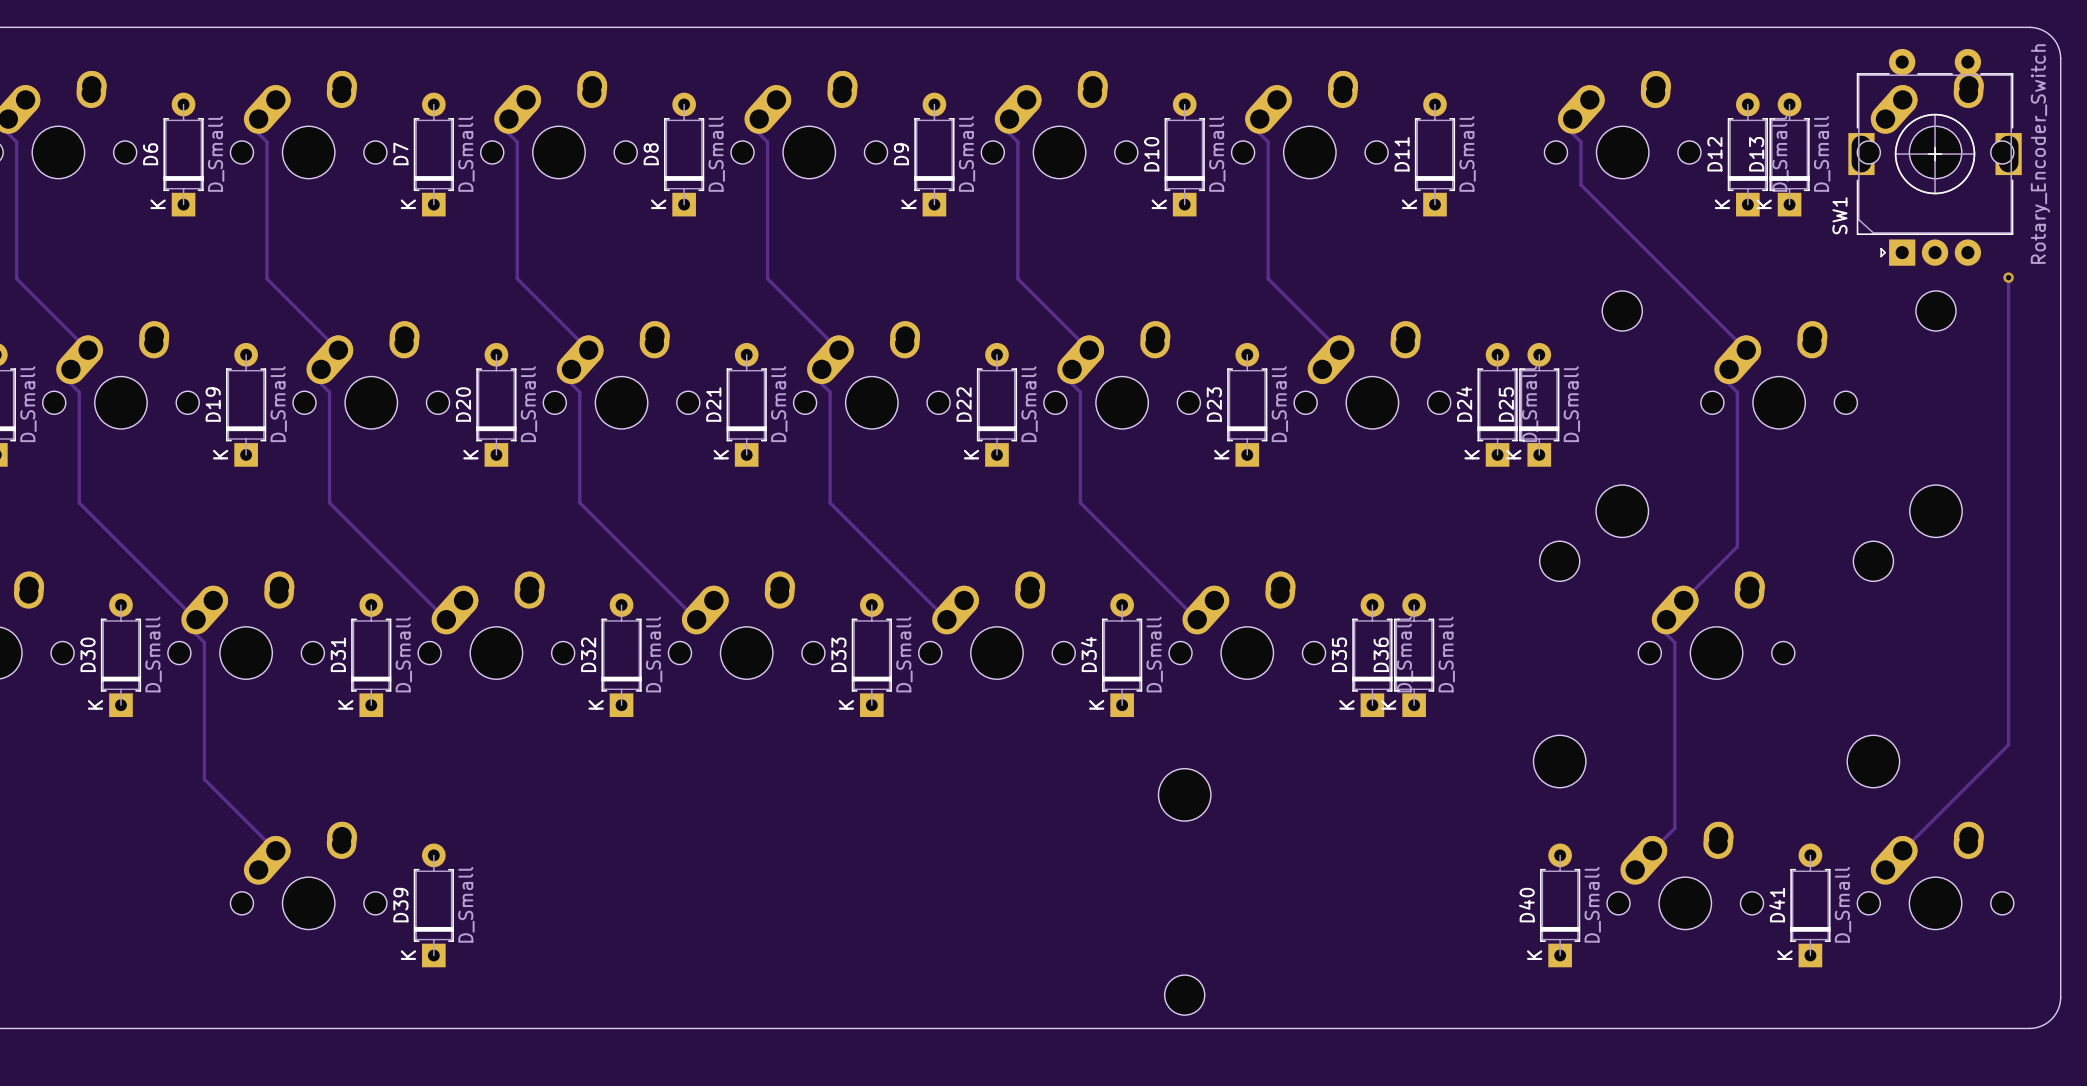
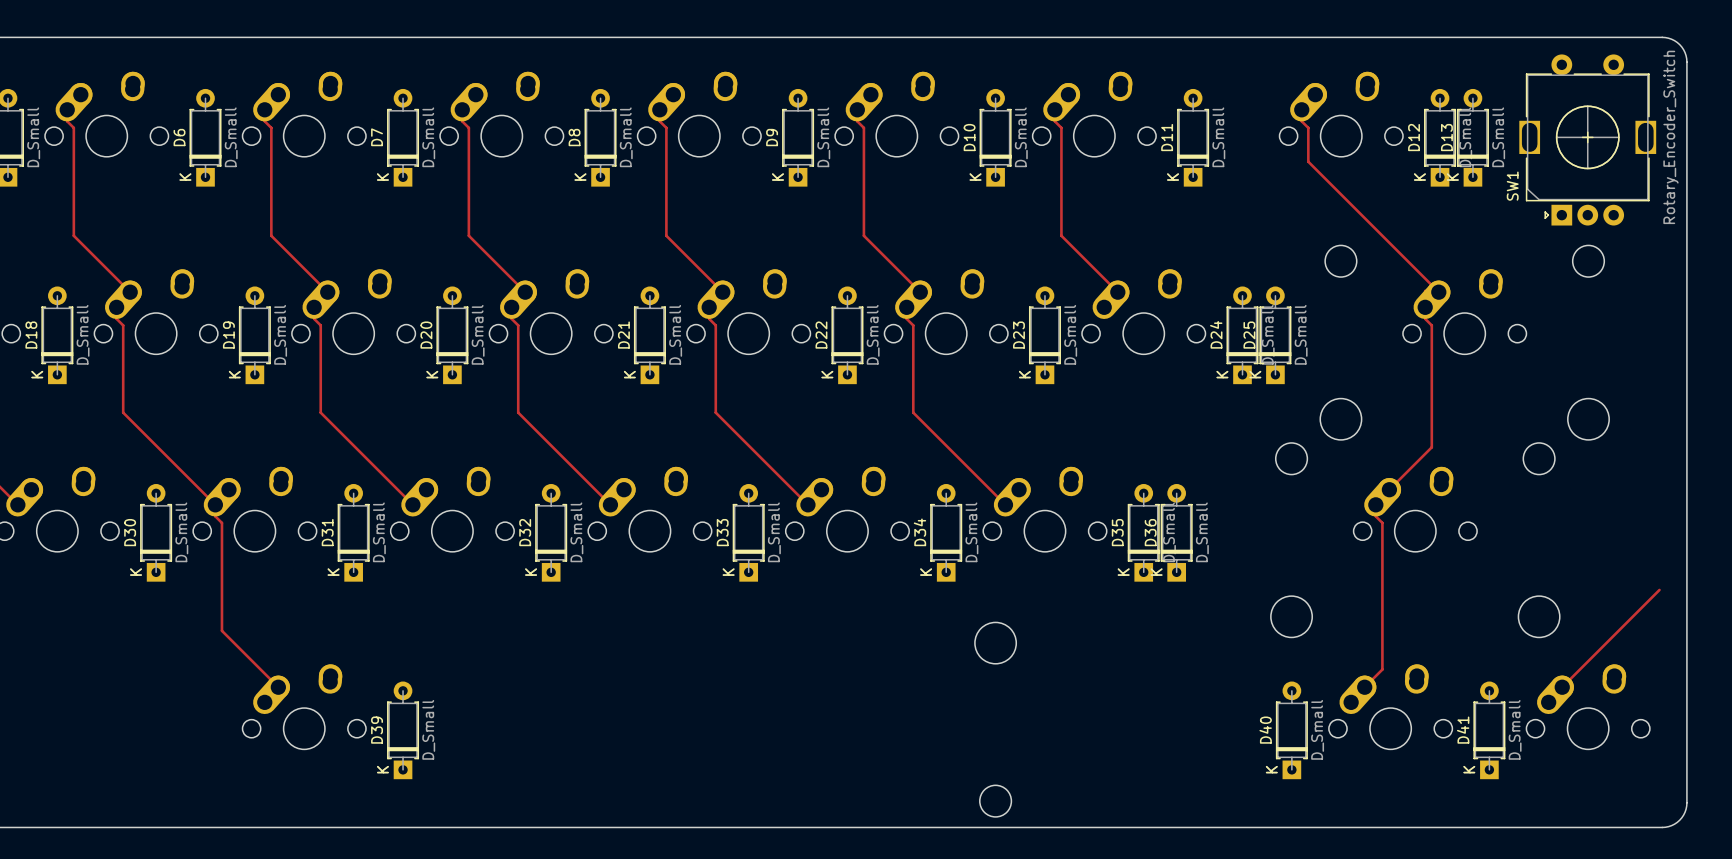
part: (1935, 124) -> none
track: (2008, 277) (2008, 744) -> (1659, 589) (1645, 603)
via: (2008, 277) -> none

